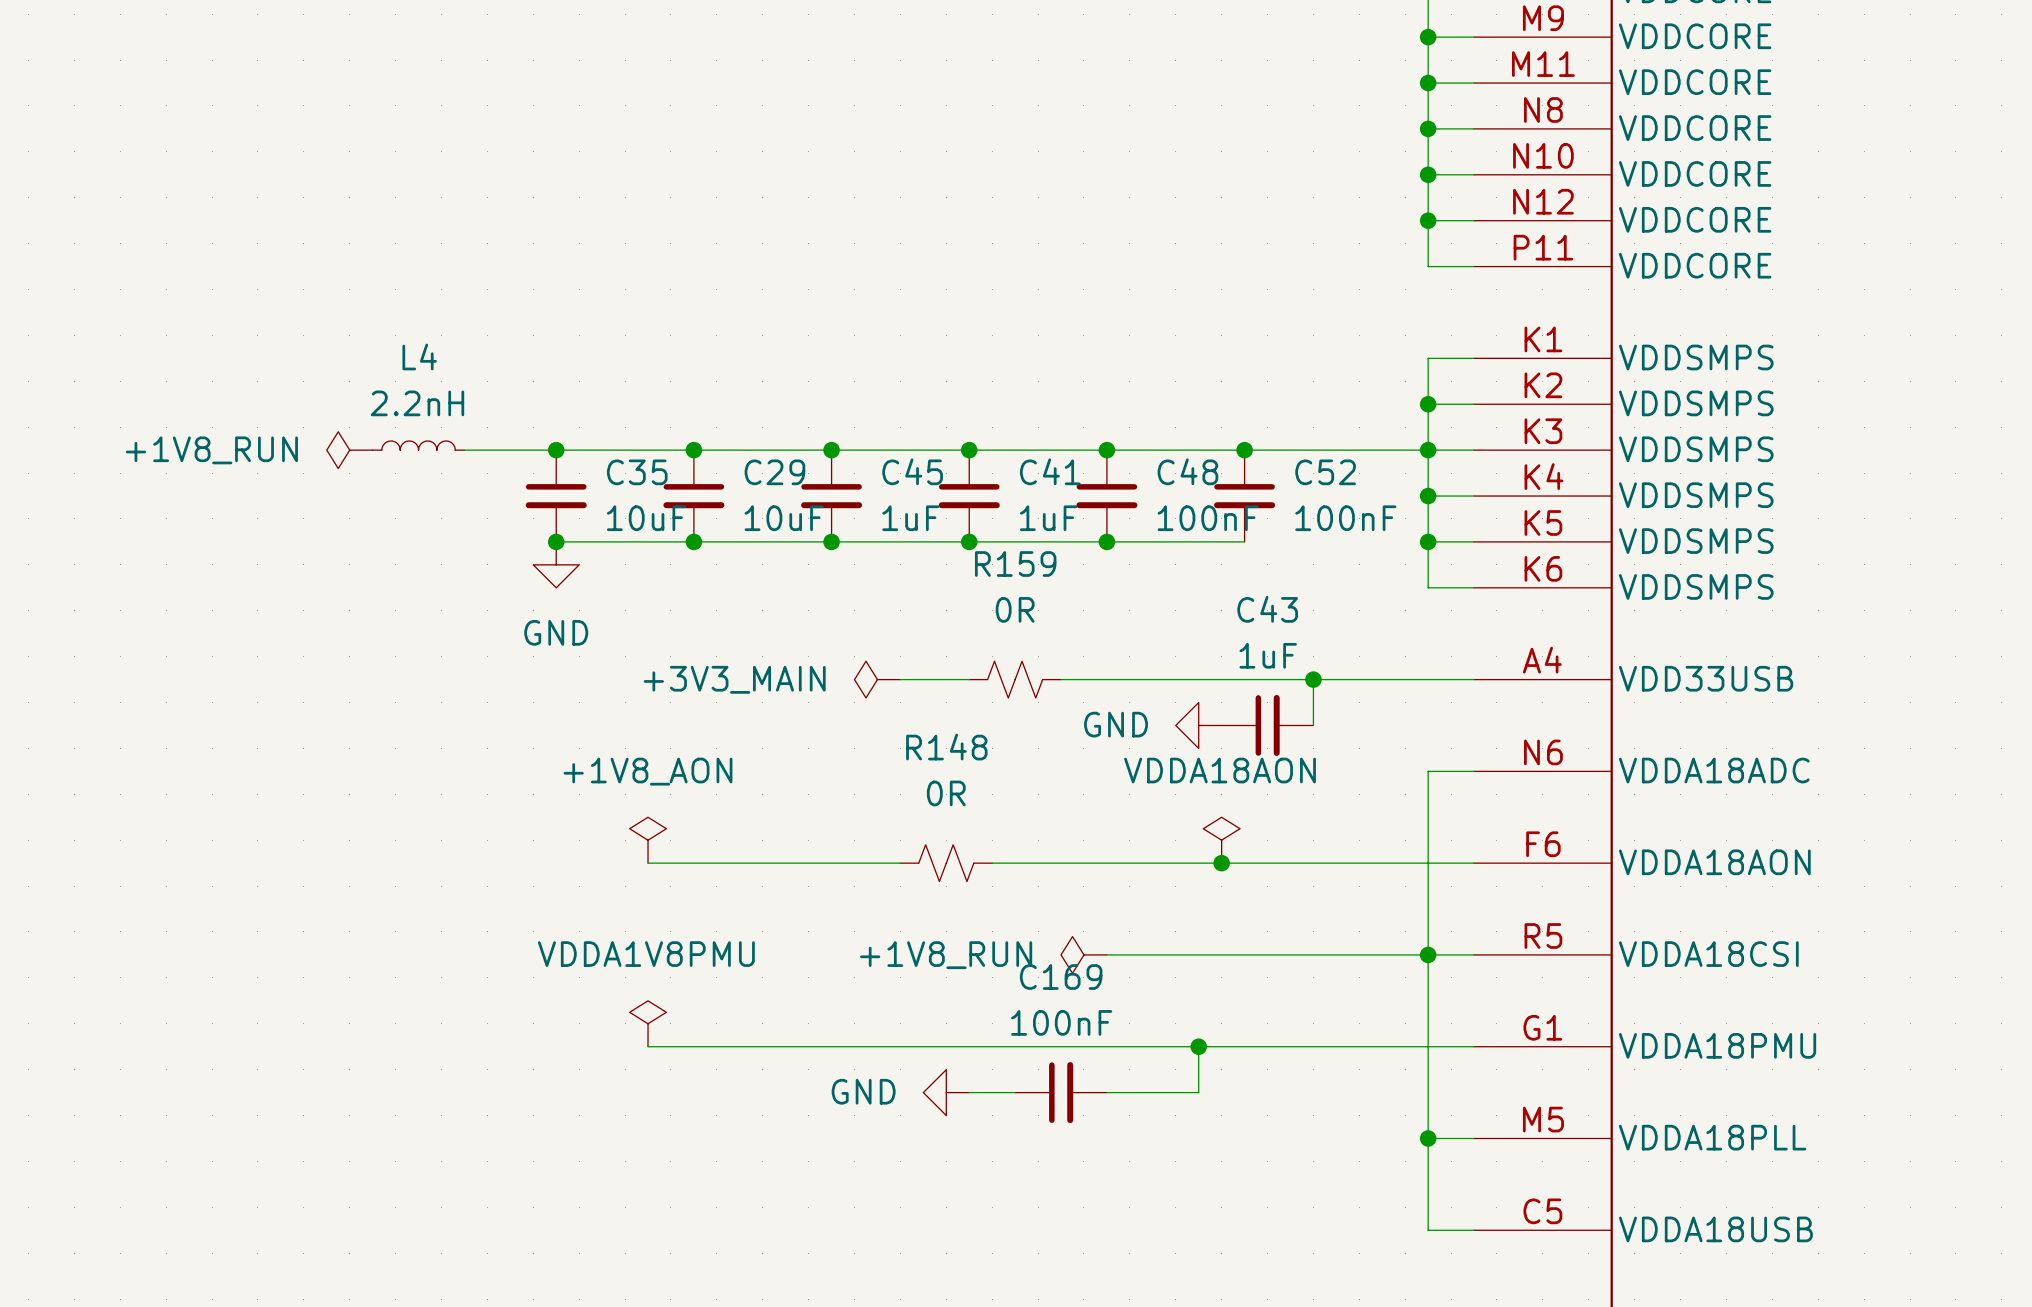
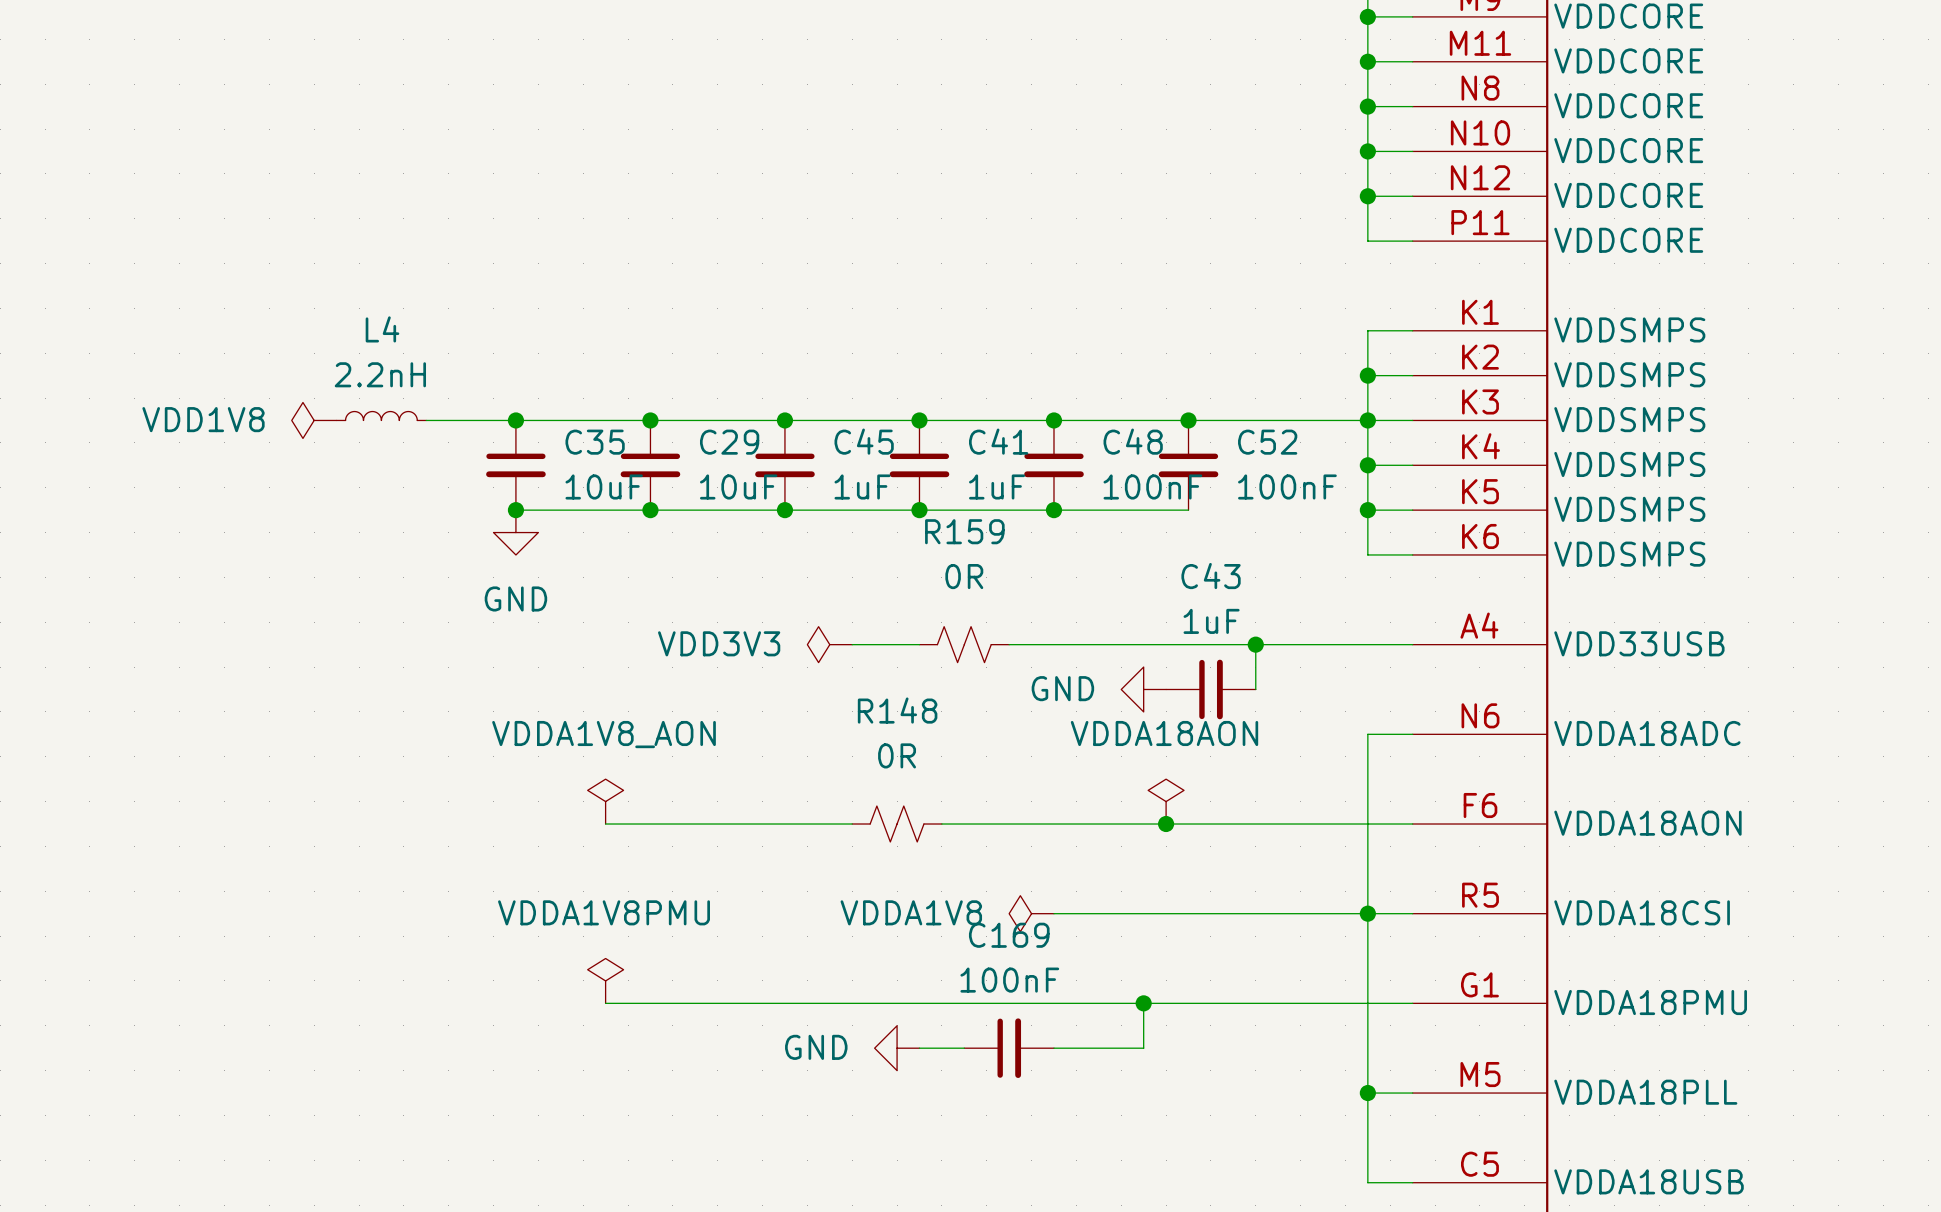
power symbol: +1V8_RUN (349, 450) -> VDD1V8 (314, 420)
power symbol: +3V3_MAIN (877, 679) -> VDD3V3 (829, 644)
power symbol: +1V8_AON (648, 840) -> VDDA1V8_AON (605, 801)
power symbol: +1V8_RUN (1083, 954) -> VDDA1V8 (1031, 913)

